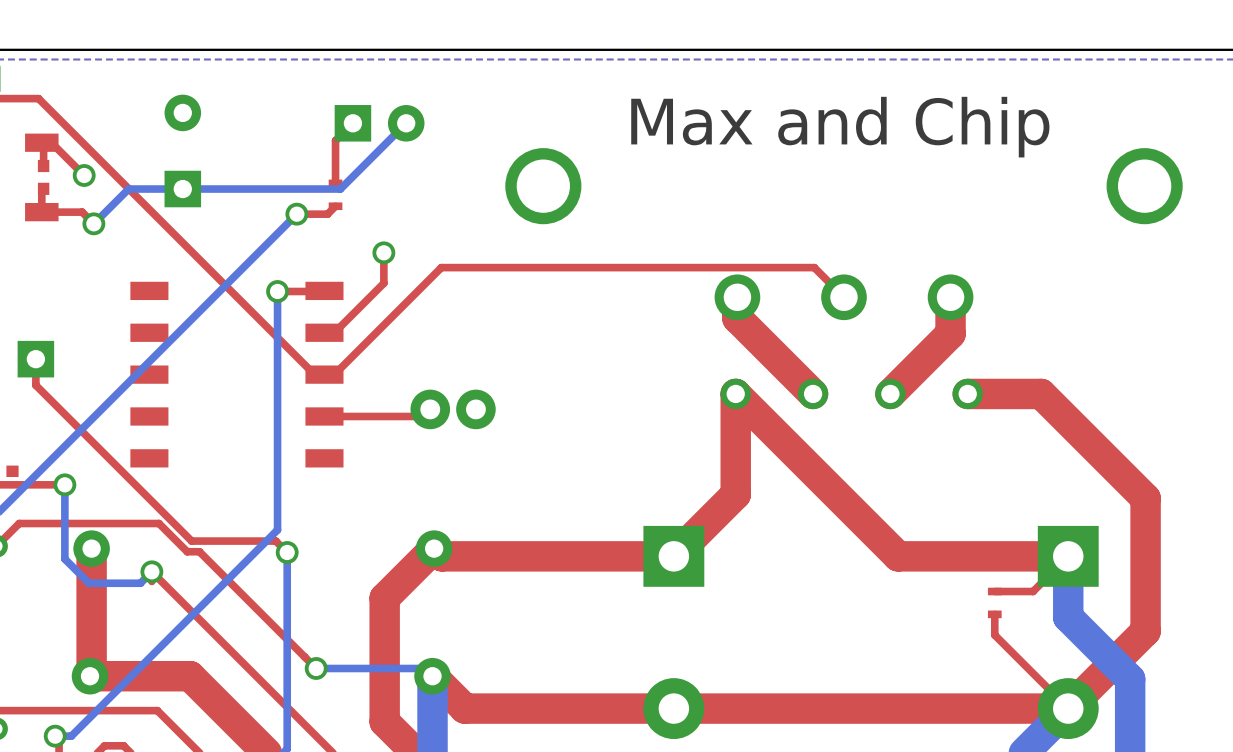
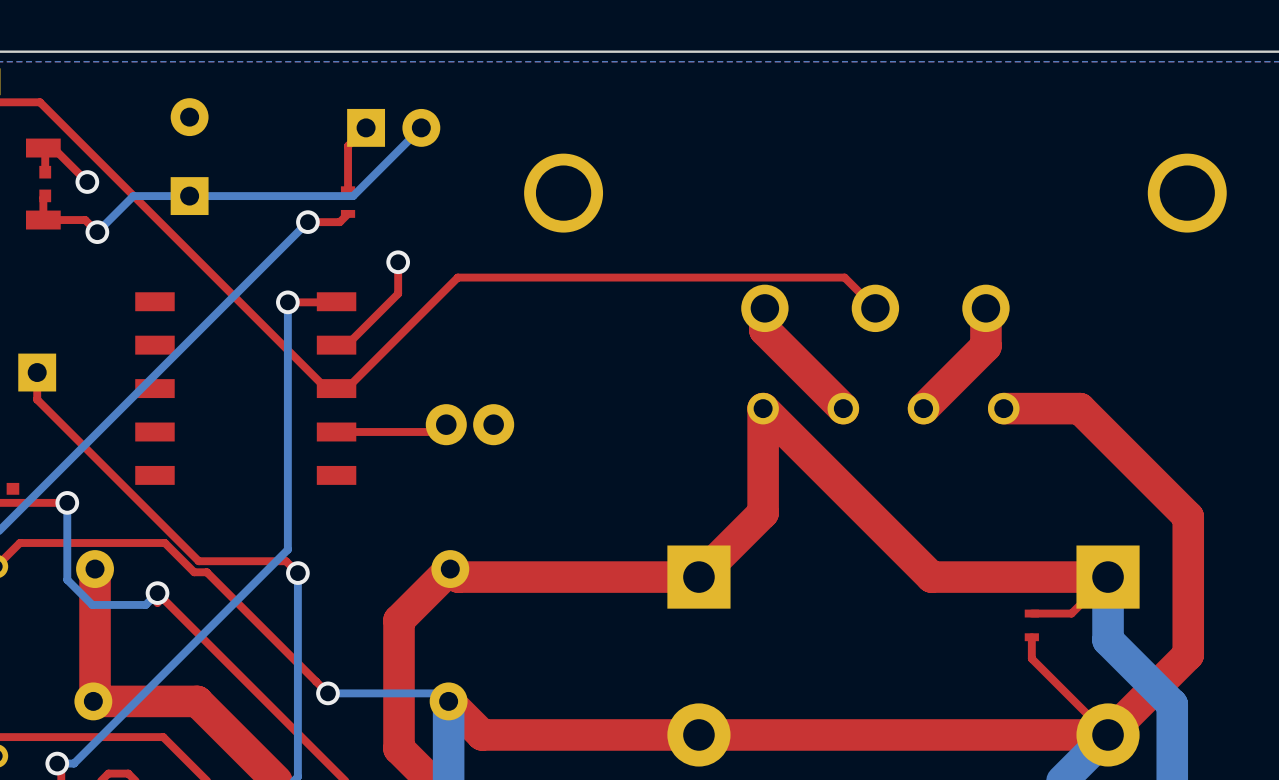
text: Max and Chip (840, 127) -> none

